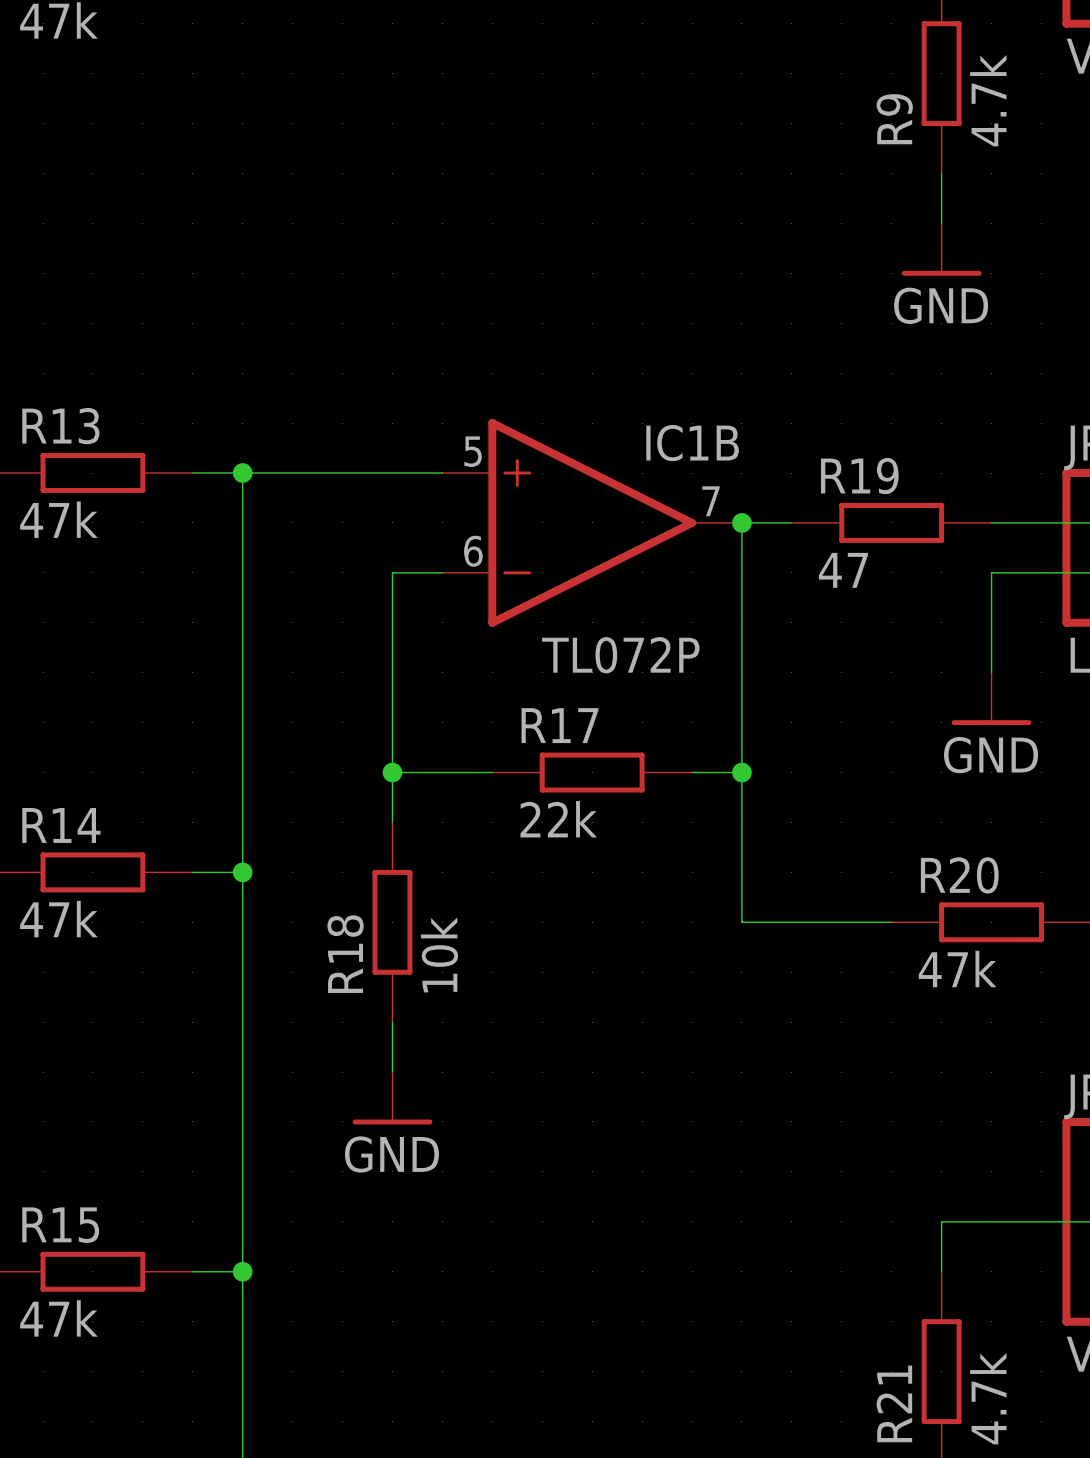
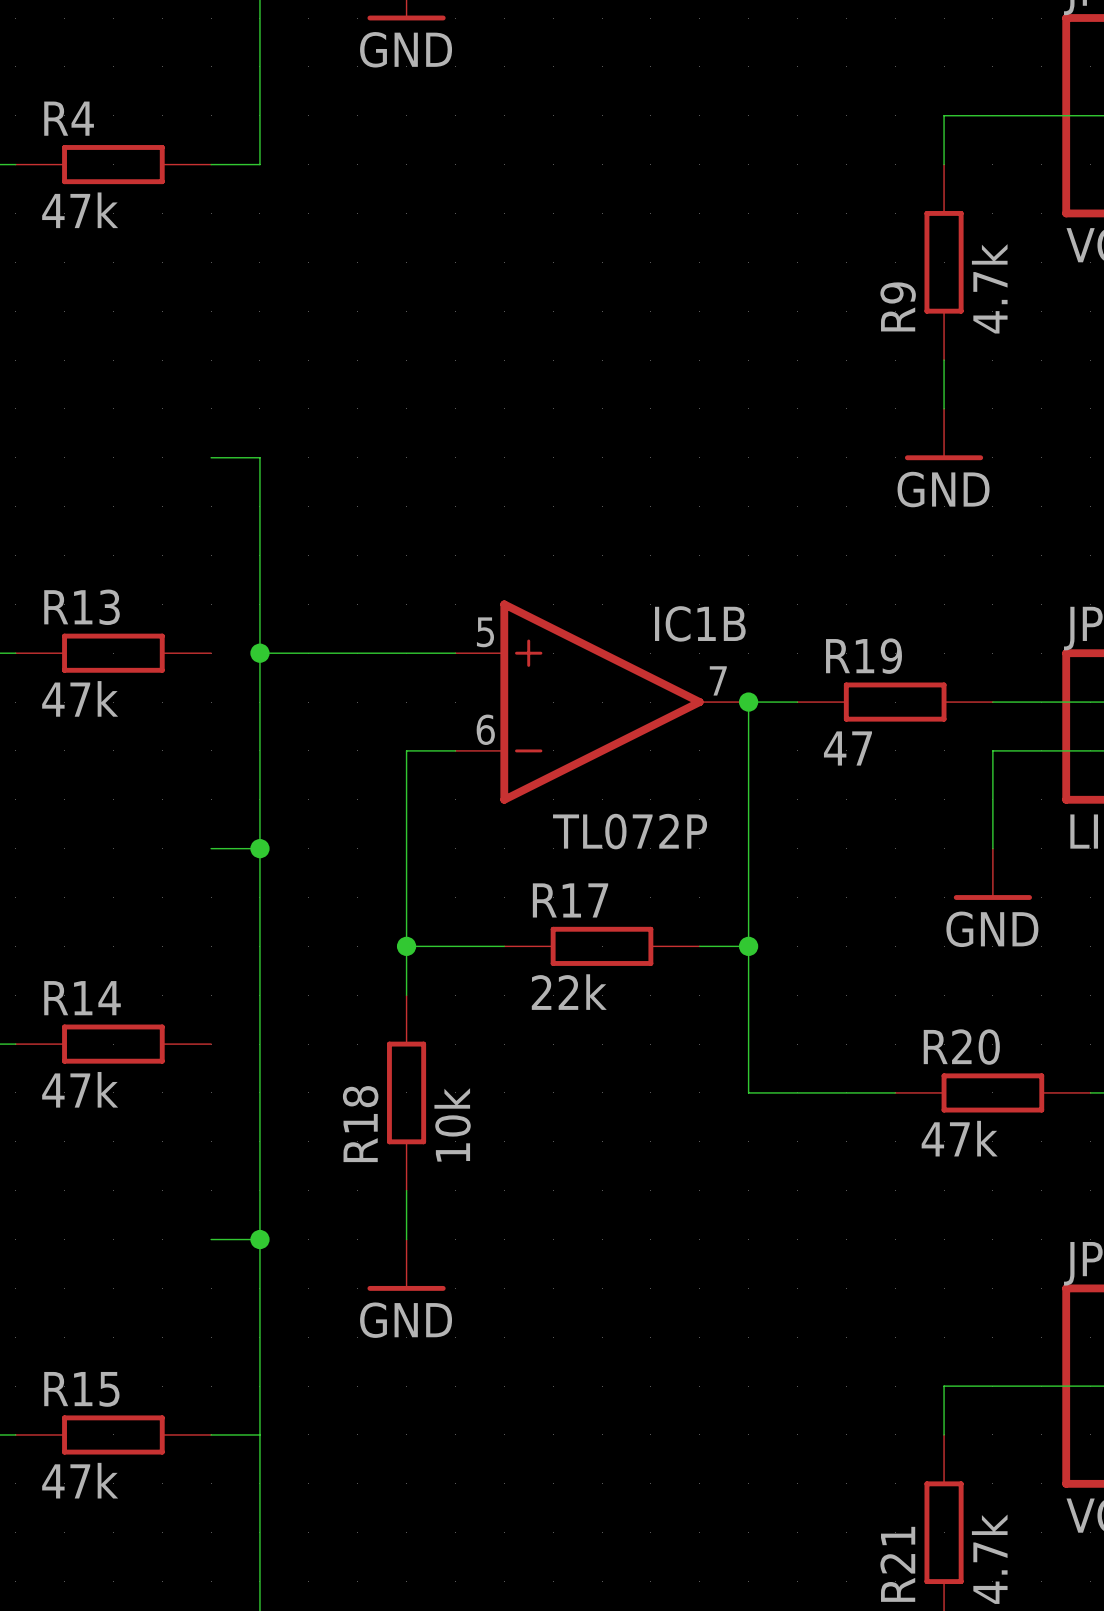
wire: (192, 473) (242, 473) -> (211, 457) (259, 457) (259, 653)
wire: none -> (211, 848) (259, 848)
junction: none -> (259, 848)
wire: (192, 872) (242, 872) -> (211, 1239) (259, 1239)
junction: (242, 872) -> none
junction: none -> (259, 1239)
junction: (242, 1271) -> none

